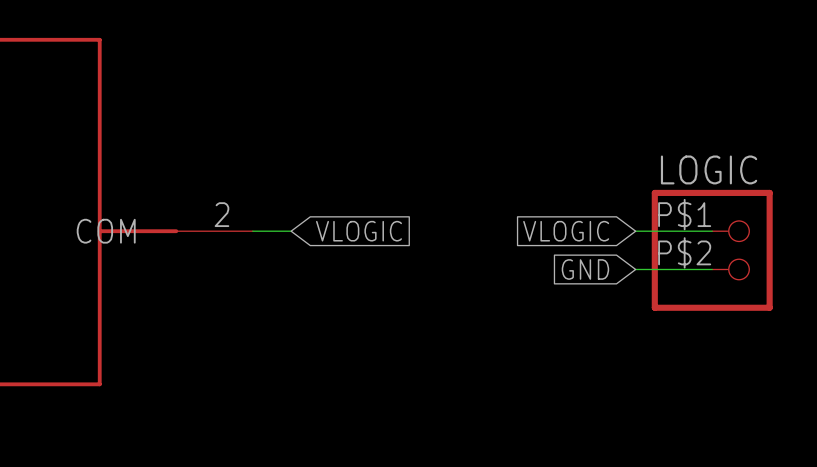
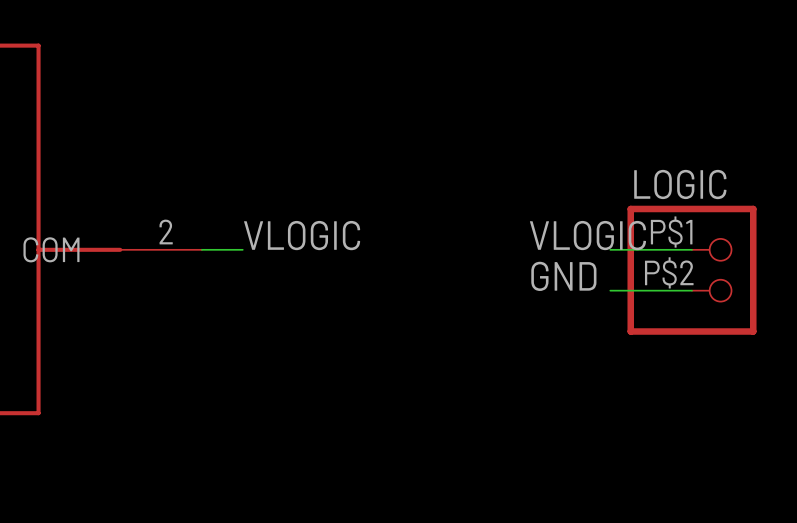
label: none -> VLOGIC (302, 235)
label: none -> VLOGIC (587, 235)
global label: VLOGIC (359, 231) -> none
global label: VLOGIC (566, 231) -> none
label: none -> GND (563, 276)
global label: GND (585, 269) -> none

